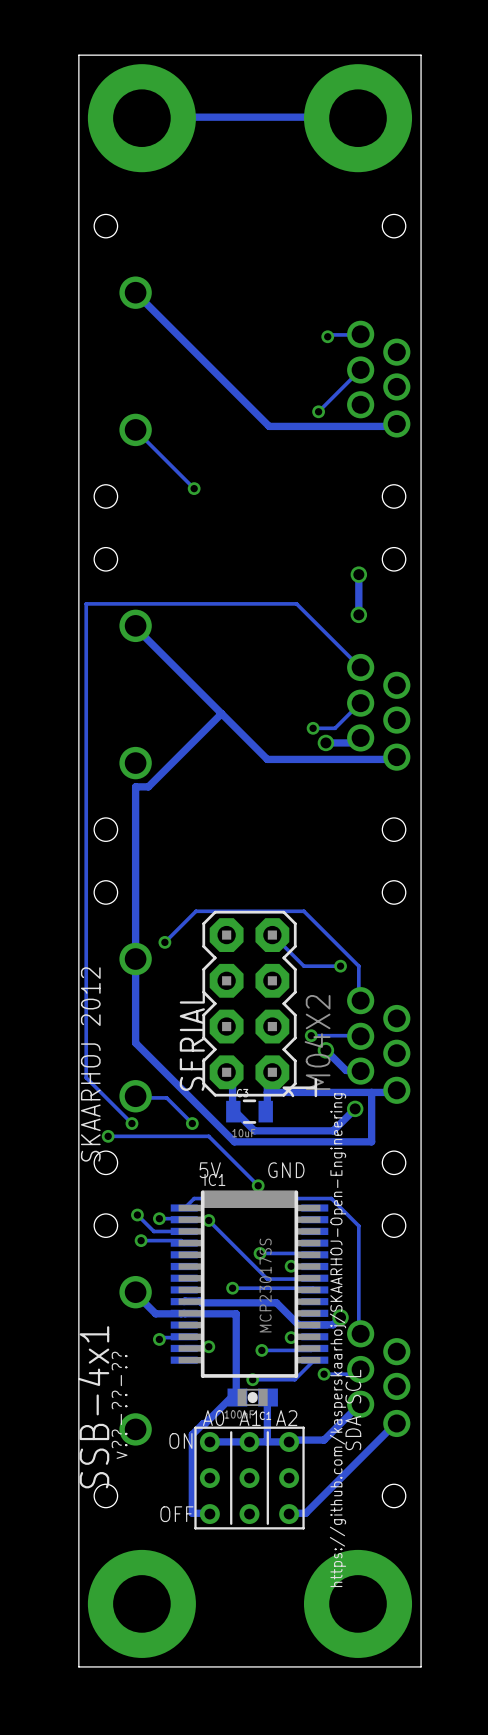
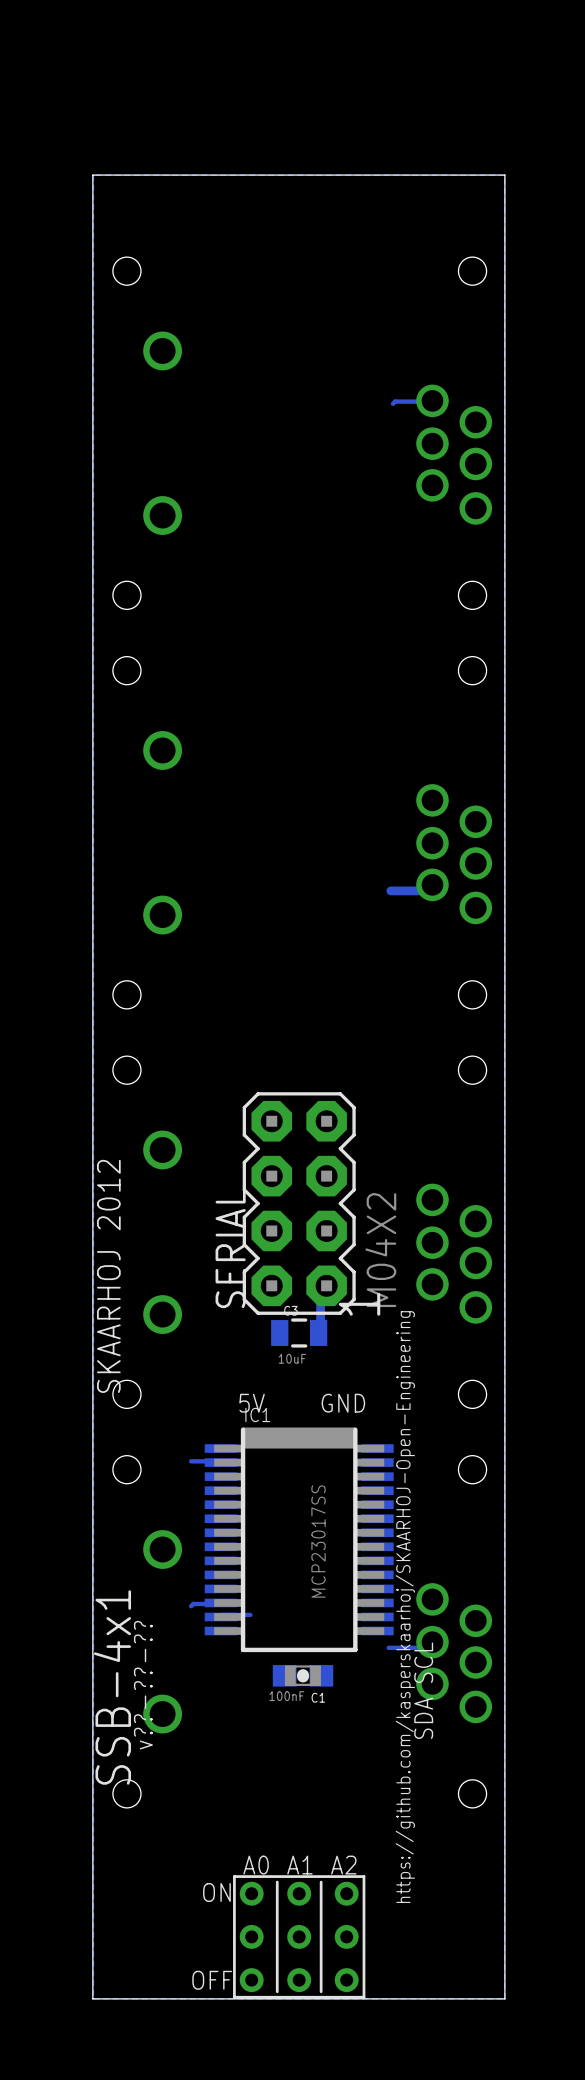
part: (141, 118) -> none
track: (358, 118) (141, 118) -> none
part: (358, 118) -> none
board edge: (421, 146) (421, 55) (78, 55) (78, 1666) -> (504, 175) (92, 175) (92, 1998) (94, 1998)
zone outline: none -> (504, 175) (504, 1998) (93, 1998) (93, 175) (504, 175)
track: (135, 292) (269, 426) (393, 426) (396, 423) -> none
via: (327, 336) -> none
track: (360, 369) (318, 411) -> none
via: (318, 411) -> none
track: (135, 430) (194, 488) -> none
via: (194, 488) -> none
track: (358, 574) (358, 614) -> none
via: (358, 574) -> none
via: (358, 614) -> none
track: (135, 625) (267, 759) (393, 759) (396, 757) -> none
track: (360, 667) (296, 603) (86, 603) (86, 1077) (131, 1123) -> none
track: (360, 703) (335, 728) (313, 728) -> none
track: (221, 713) (148, 786) (135, 786) (135, 958) -> none
via: (313, 728) -> none
via: (325, 742) -> none
track: (272, 935) (303, 966) (340, 966) -> none
track: (164, 942) (195, 911) (303, 911) (358, 966) (358, 999) (360, 1000) -> none
via: (164, 942) -> none
track: (135, 959) (135, 1043) (234, 1141) (371, 1141) (371, 1092) -> none
via: (340, 966) -> none
track: (311, 1035) (360, 1036) -> none
via: (311, 1035) -> none
track: (325, 1050) (346, 1070) (360, 1071) -> none
via: (325, 1050) -> none
track: (226, 1072) (232, 1072) (232, 1110) (254, 1130) (333, 1130) (355, 1108) -> none
track: (396, 1090) (393, 1092) (267, 1092) -> none
track: (135, 1096) (135, 1097) (166, 1097) (192, 1123) -> none
via: (355, 1108) -> none
via: (131, 1123) -> none
via: (192, 1123) -> none
track: (108, 1136) (208, 1136) (258, 1185) -> none
via: (108, 1136) -> none
via: (258, 1185) -> none
track: (184, 1208) (194, 1198) (331, 1198) (358, 1225) (358, 1332) (360, 1333) -> none
track: (137, 1215) (153, 1231) (184, 1231) -> none
via: (137, 1215) -> none
via: (159, 1218) -> none
track: (208, 1220) (267, 1279) (314, 1278) -> none
via: (208, 1220) -> none
track: (141, 1240) (181, 1240) (184, 1243) -> none
via: (141, 1240) -> none
track: (260, 1253) (314, 1254) -> none
via: (260, 1253) -> none
via: (291, 1266) -> none
track: (232, 1288) (313, 1288) (314, 1289) -> none
via: (232, 1288) -> none
track: (135, 1292) (155, 1313) (236, 1313) (237, 1397) (232, 1396) (192, 1434) (192, 1513) (209, 1514) -> none
track: (184, 1301) (276, 1302) (298, 1324) (333, 1324) (340, 1317) -> none
via: (340, 1317) -> none
via: (291, 1337) -> none
via: (159, 1339) -> none
via: (208, 1346) -> none
track: (314, 1348) (311, 1350) (261, 1350) -> none
via: (261, 1350) -> none
track: (314, 1360) (294, 1379) (252, 1379) -> none
via: (324, 1374) -> none
via: (252, 1379) -> none
track: (268, 1397) (267, 1441) -> none
track: (360, 1404) (324, 1440) (209, 1442) -> none
track: (396, 1423) (305, 1513) (289, 1514) -> none
part position: (249, 1478) -> (299, 1936)
part: (141, 1603) -> none
part: (358, 1603) -> none

